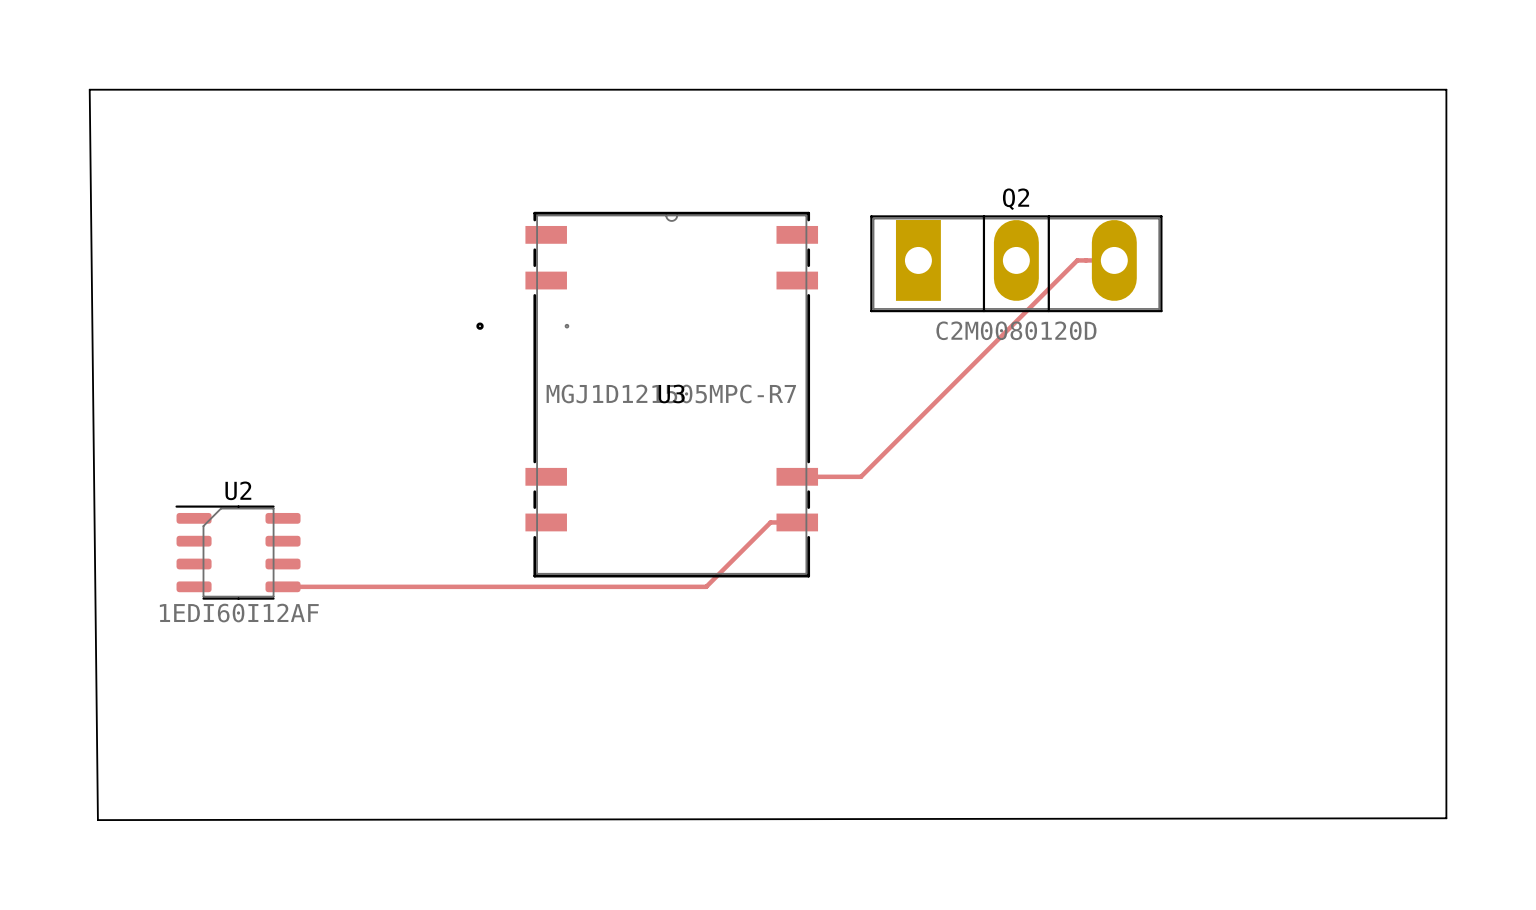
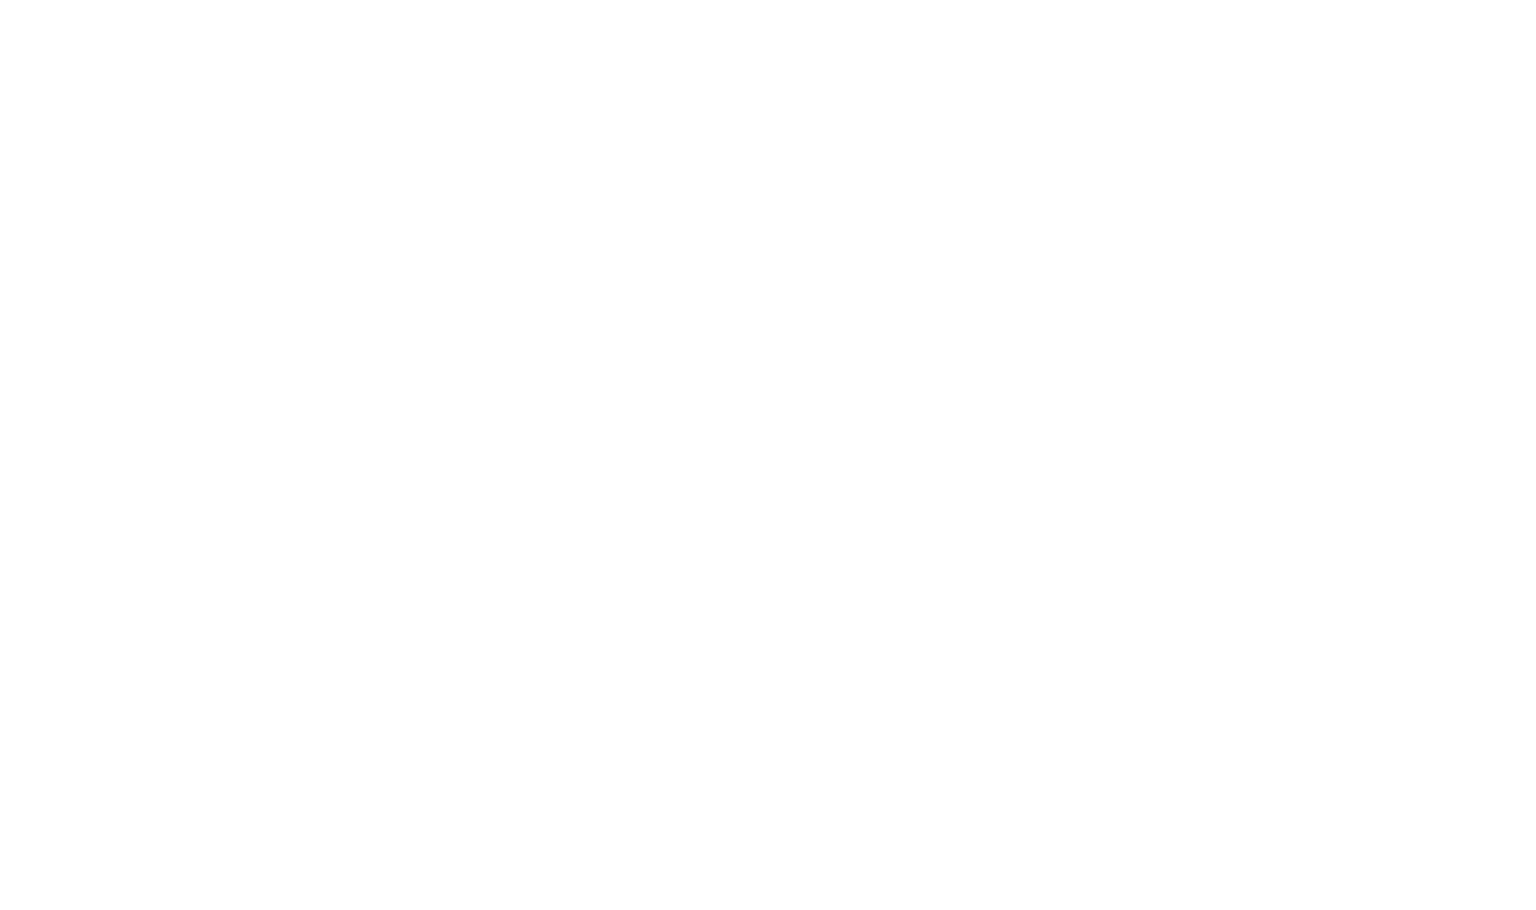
board edge: (89, 89) (97, 820) (1446, 818) (1446, 89) (89, 89) -> none
top track: (1114, 260) (1077, 260) (860, 476) (797, 476) -> none
Q2: C2M0080120D (1016, 263) -> none
U3: MGJ1D121505MPC-R7 (647, 394) -> none
top track: (797, 522) (770, 522) (706, 586) (283, 586) -> none
U2: 1EDI60I12AF (237, 552) -> none

